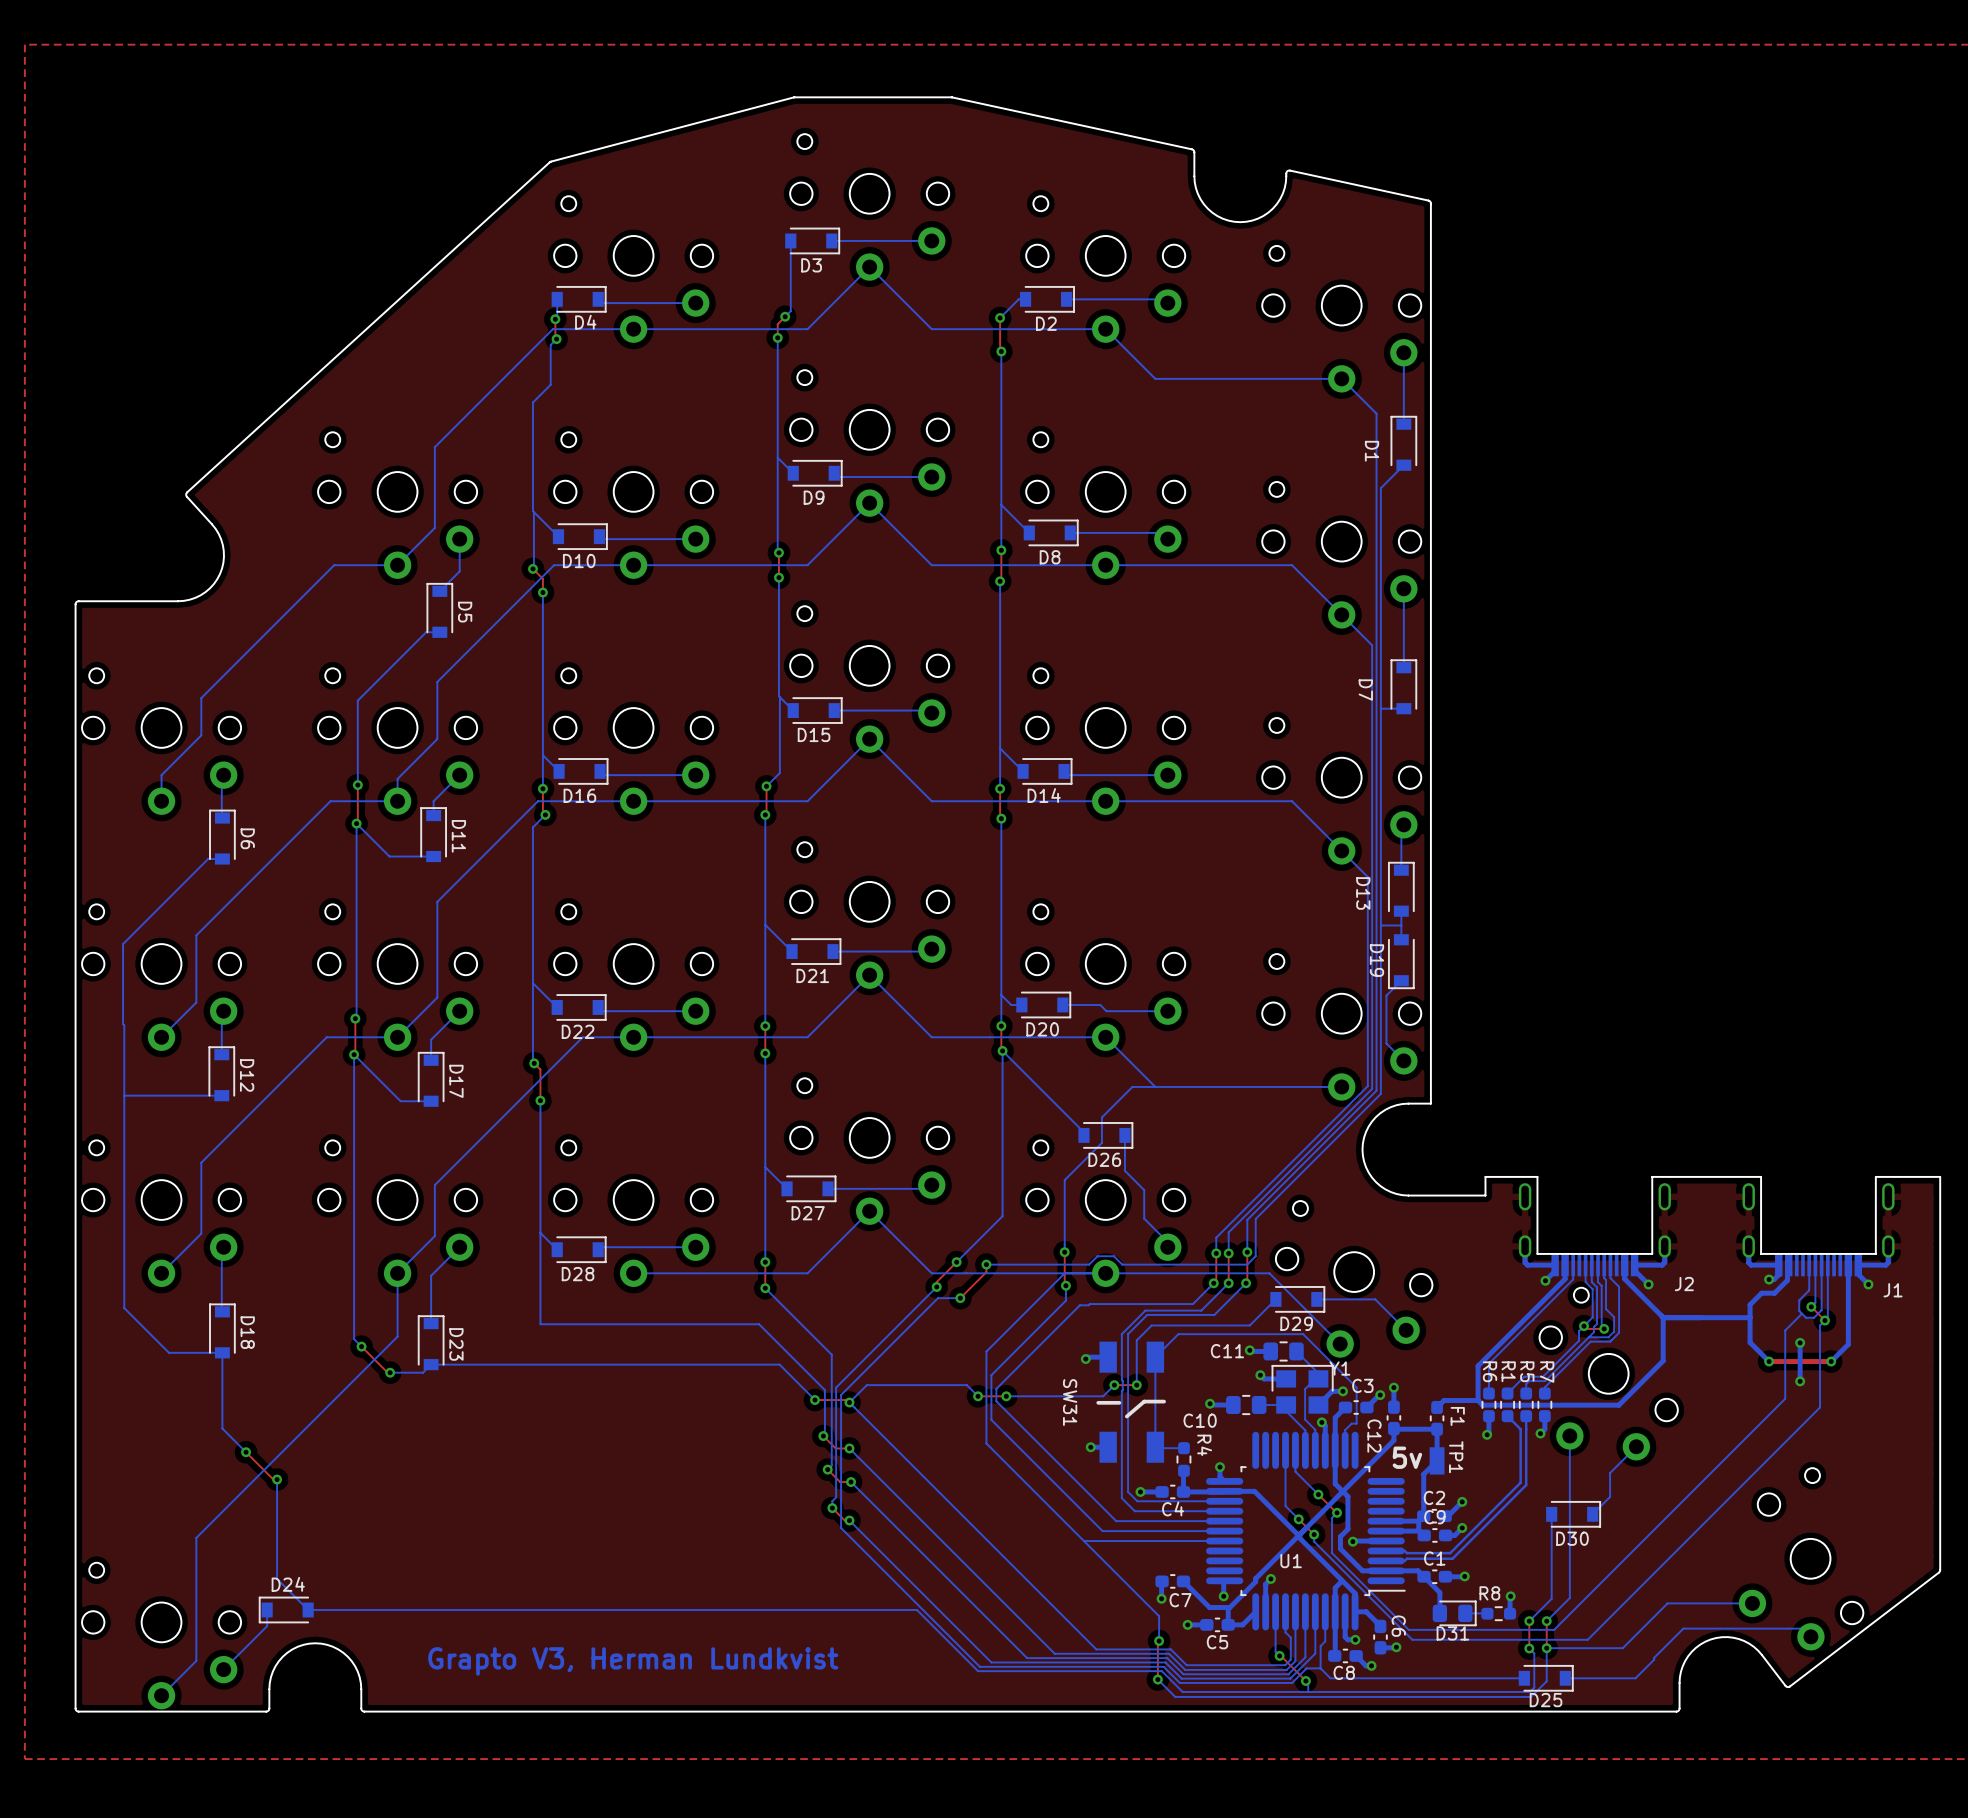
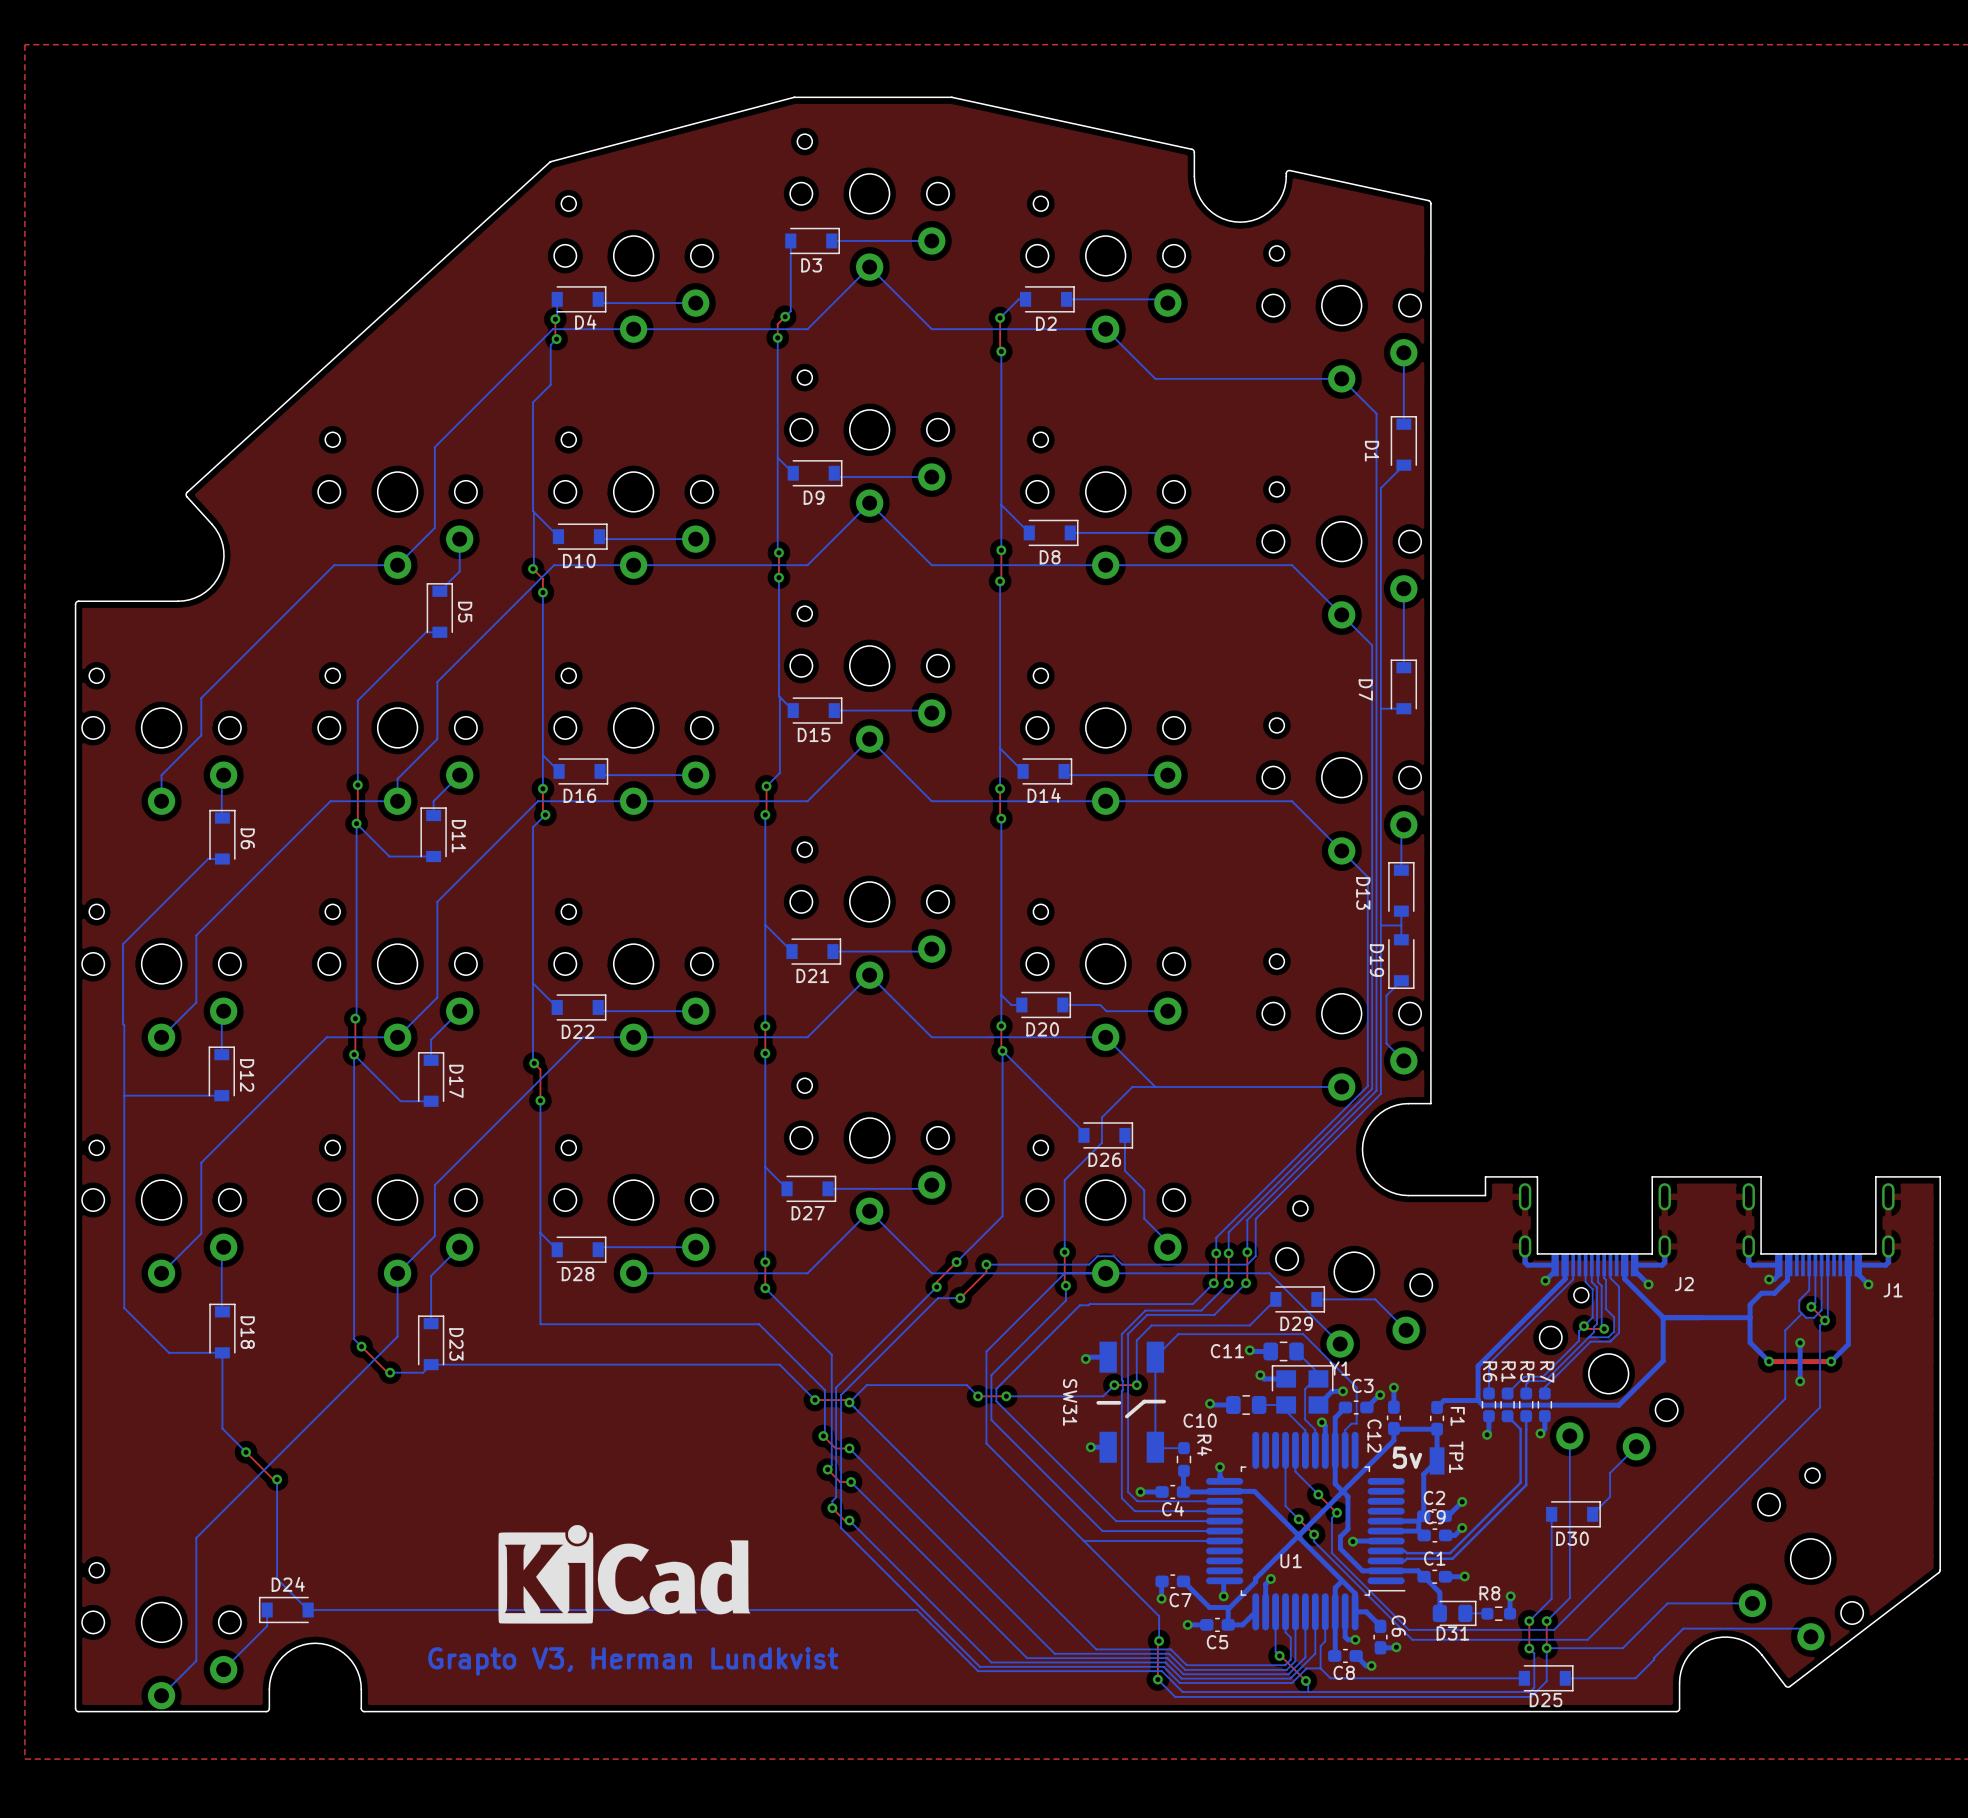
drawing: none -> [498, 1524, 751, 1624]

